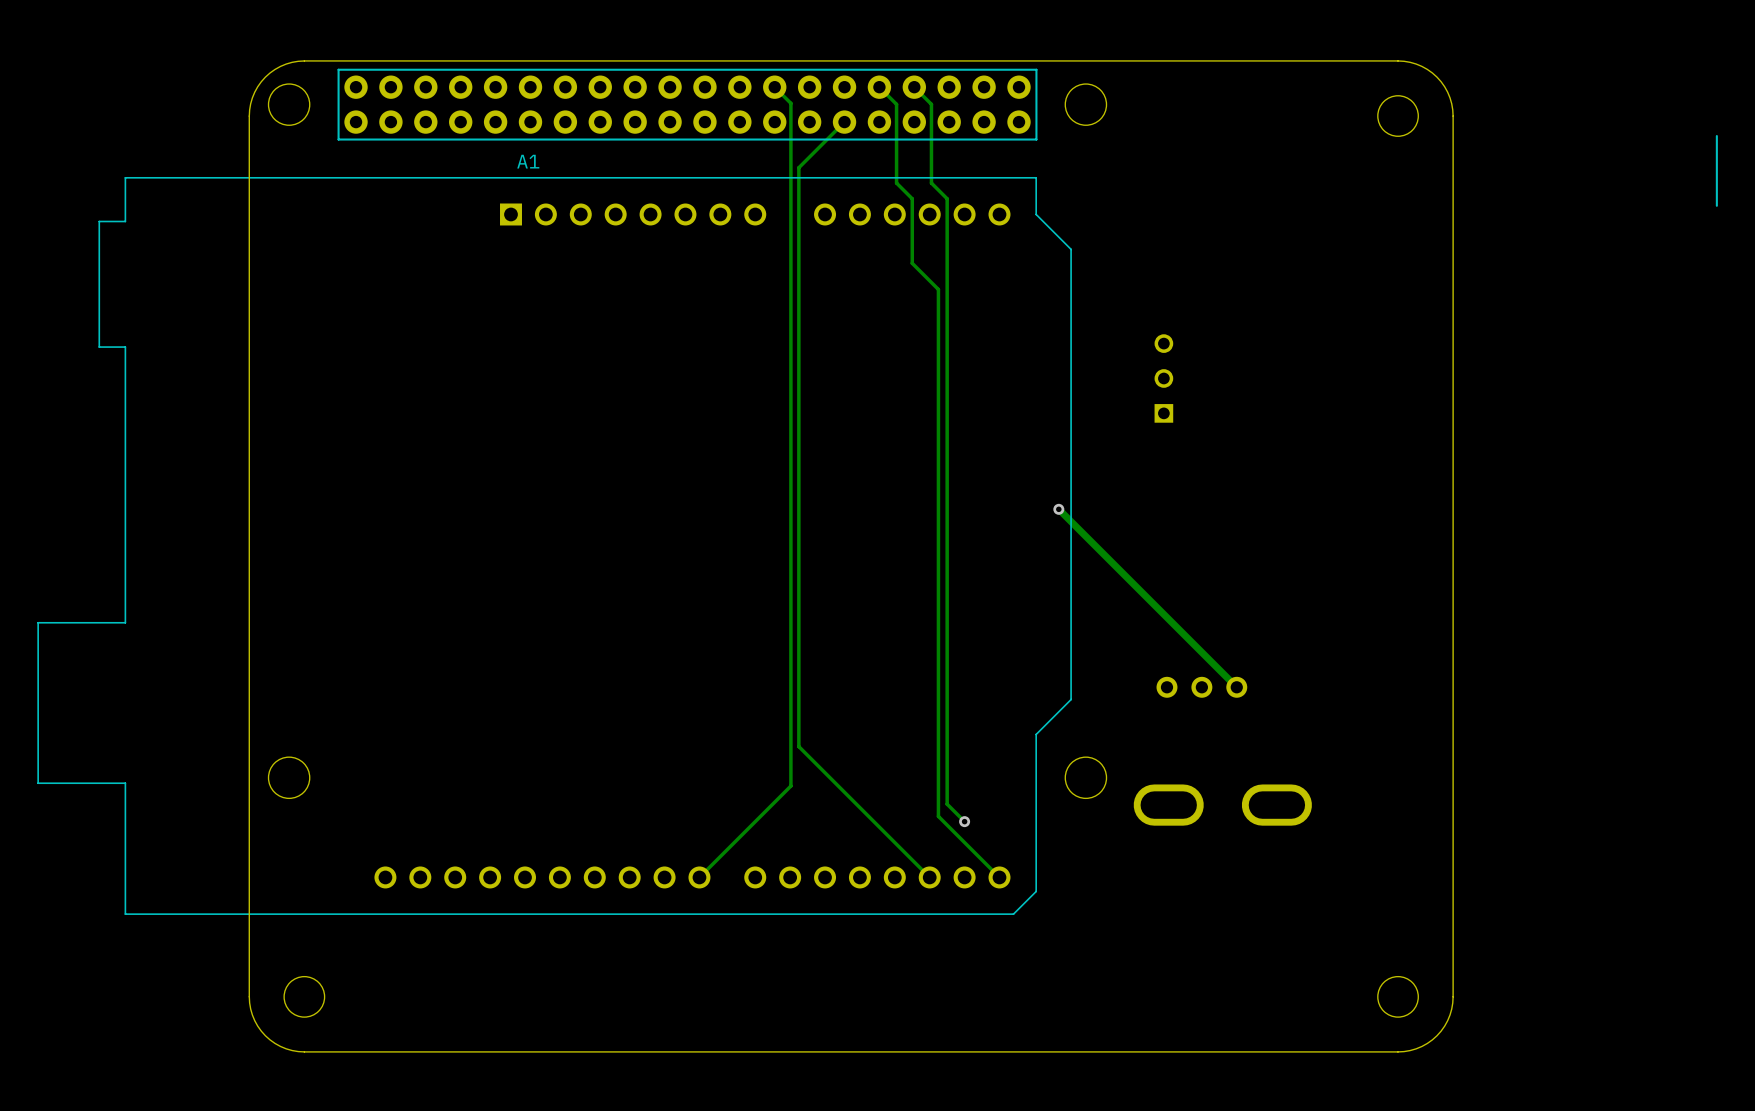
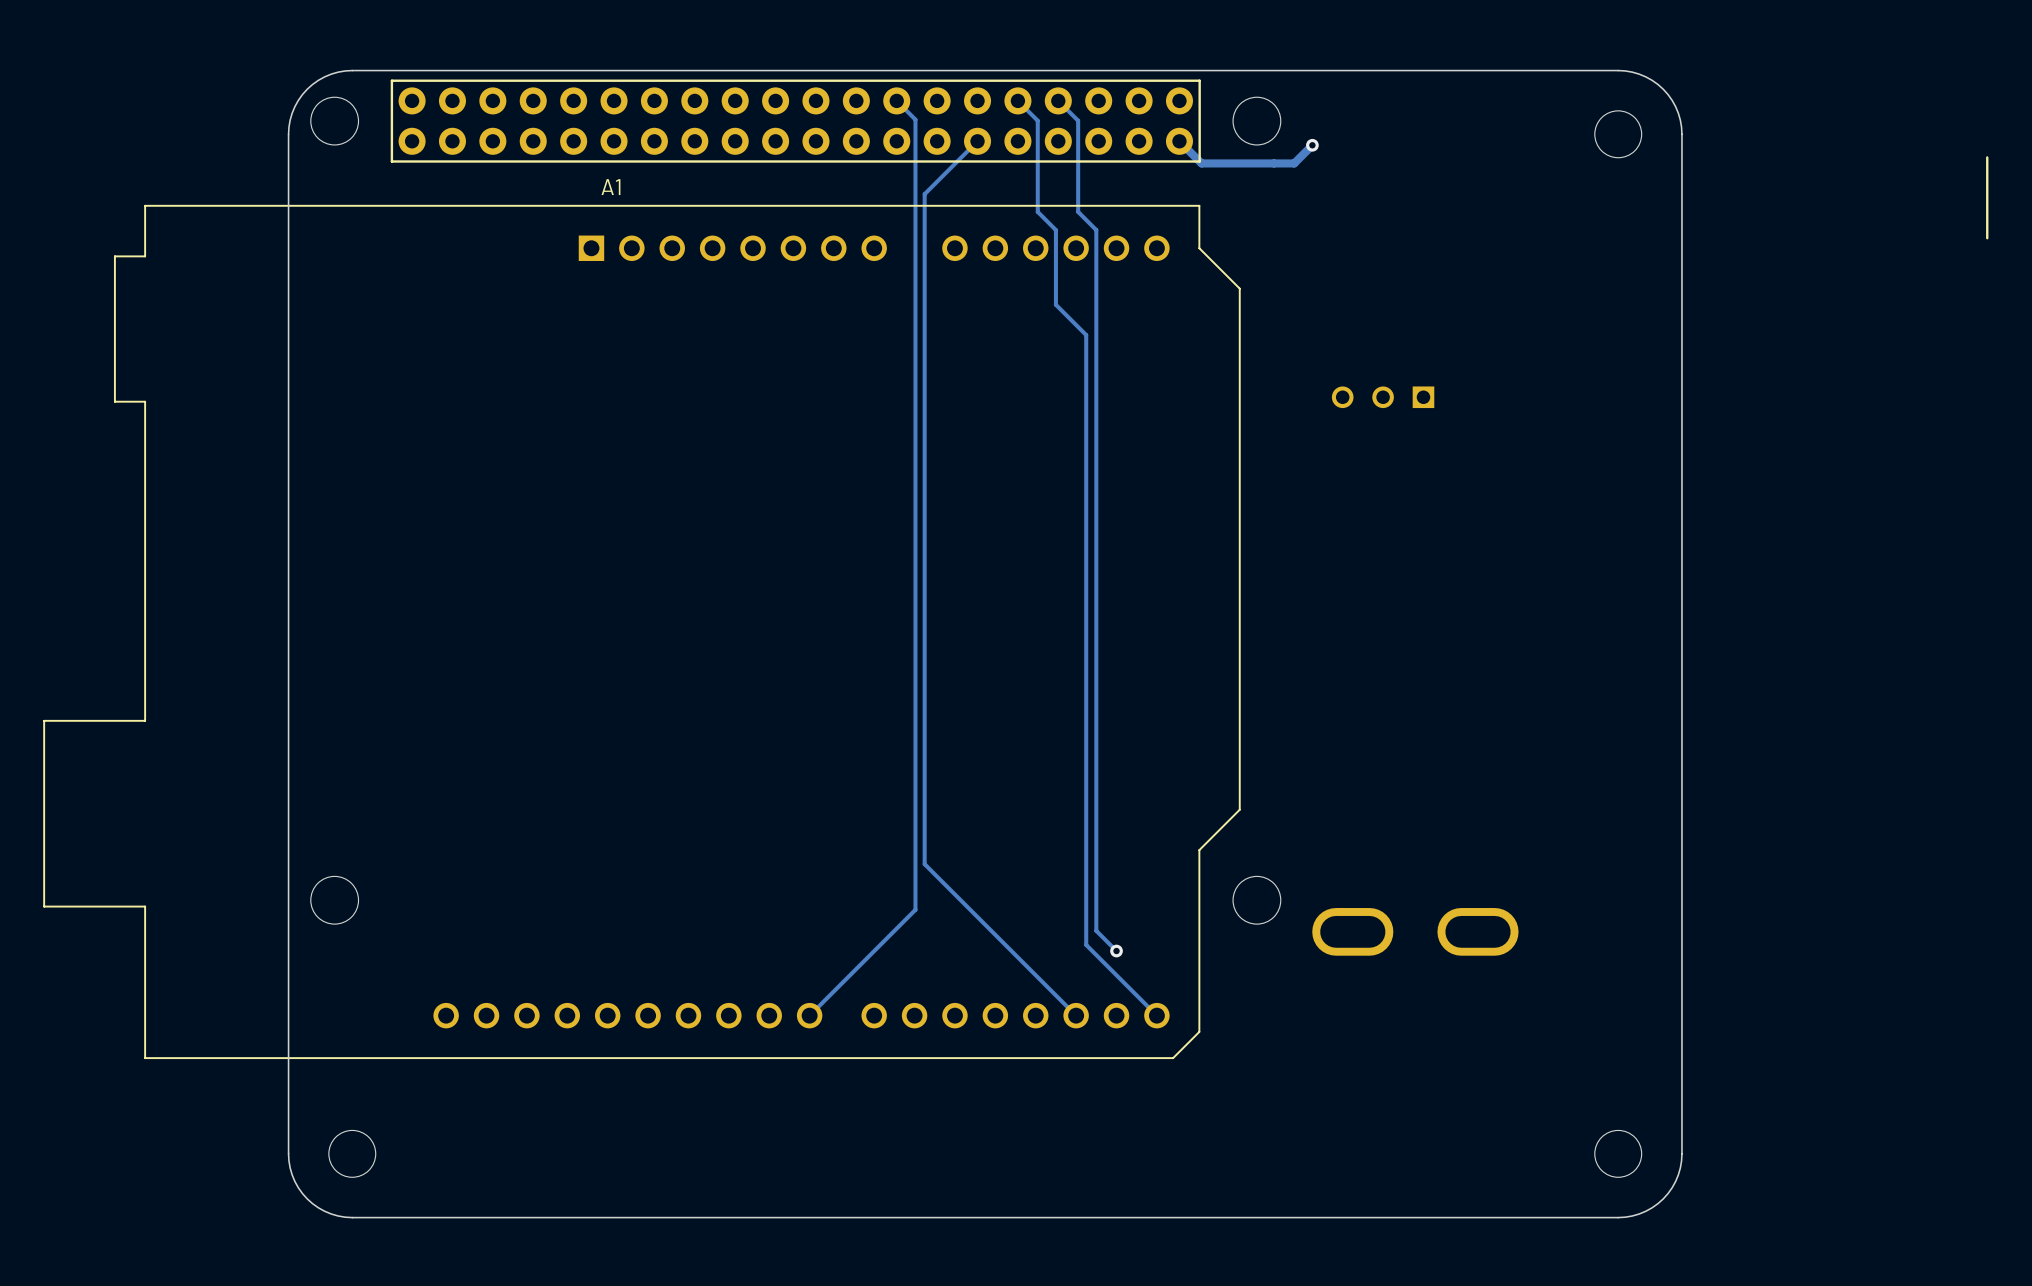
track: none -> (1179, 141) (1201, 163) (1294, 163) (1312, 145)
via: none -> (1312, 145)
part rotation: 0° (1163, 378) -> 90° counterclockwise (1383, 397)
track: (1058, 509) (1236, 687) -> none
via: (1058, 509) -> none
part: (1201, 687) -> none

